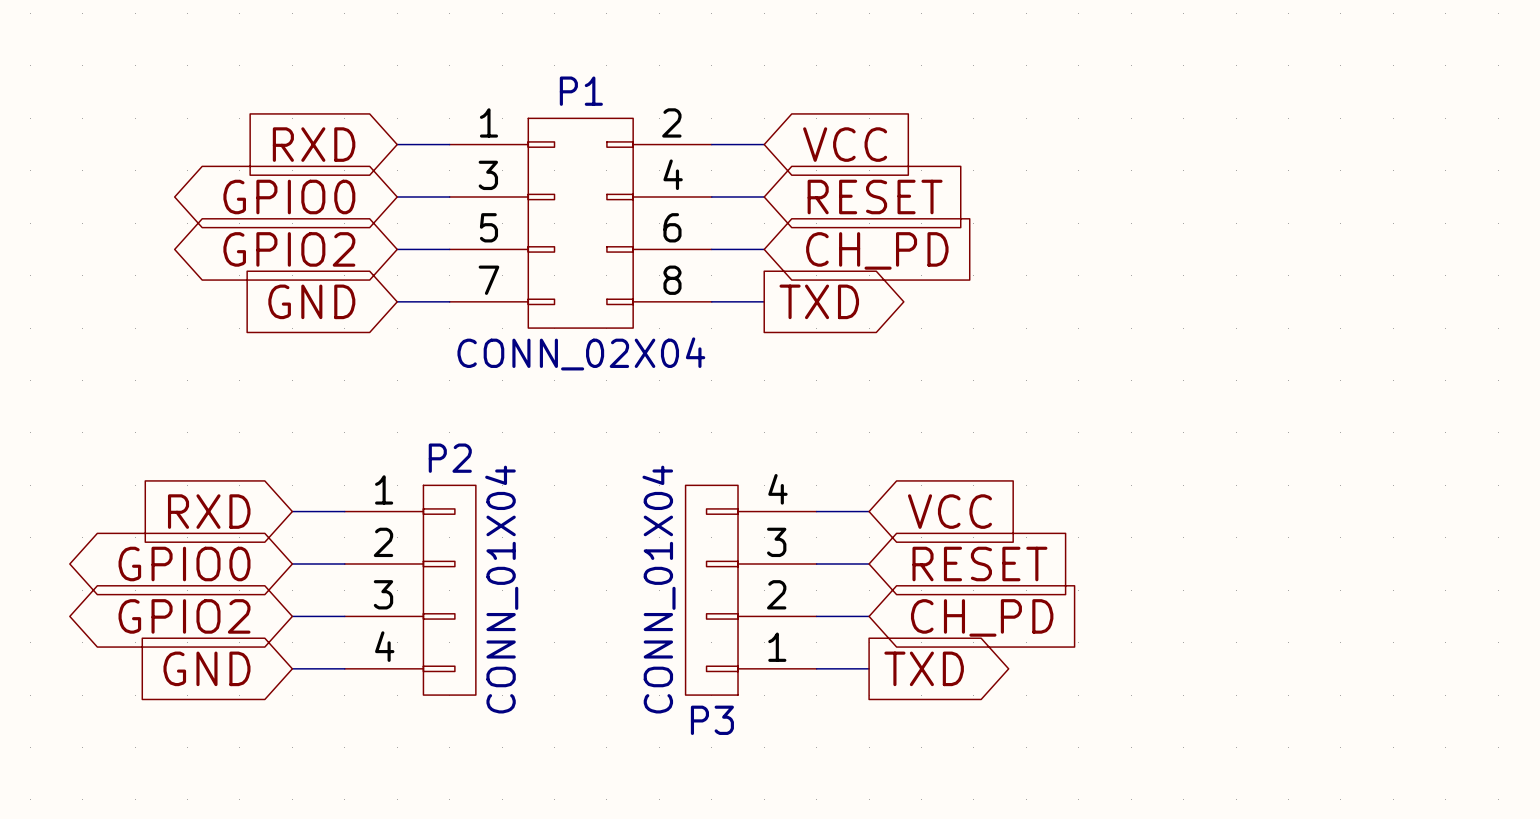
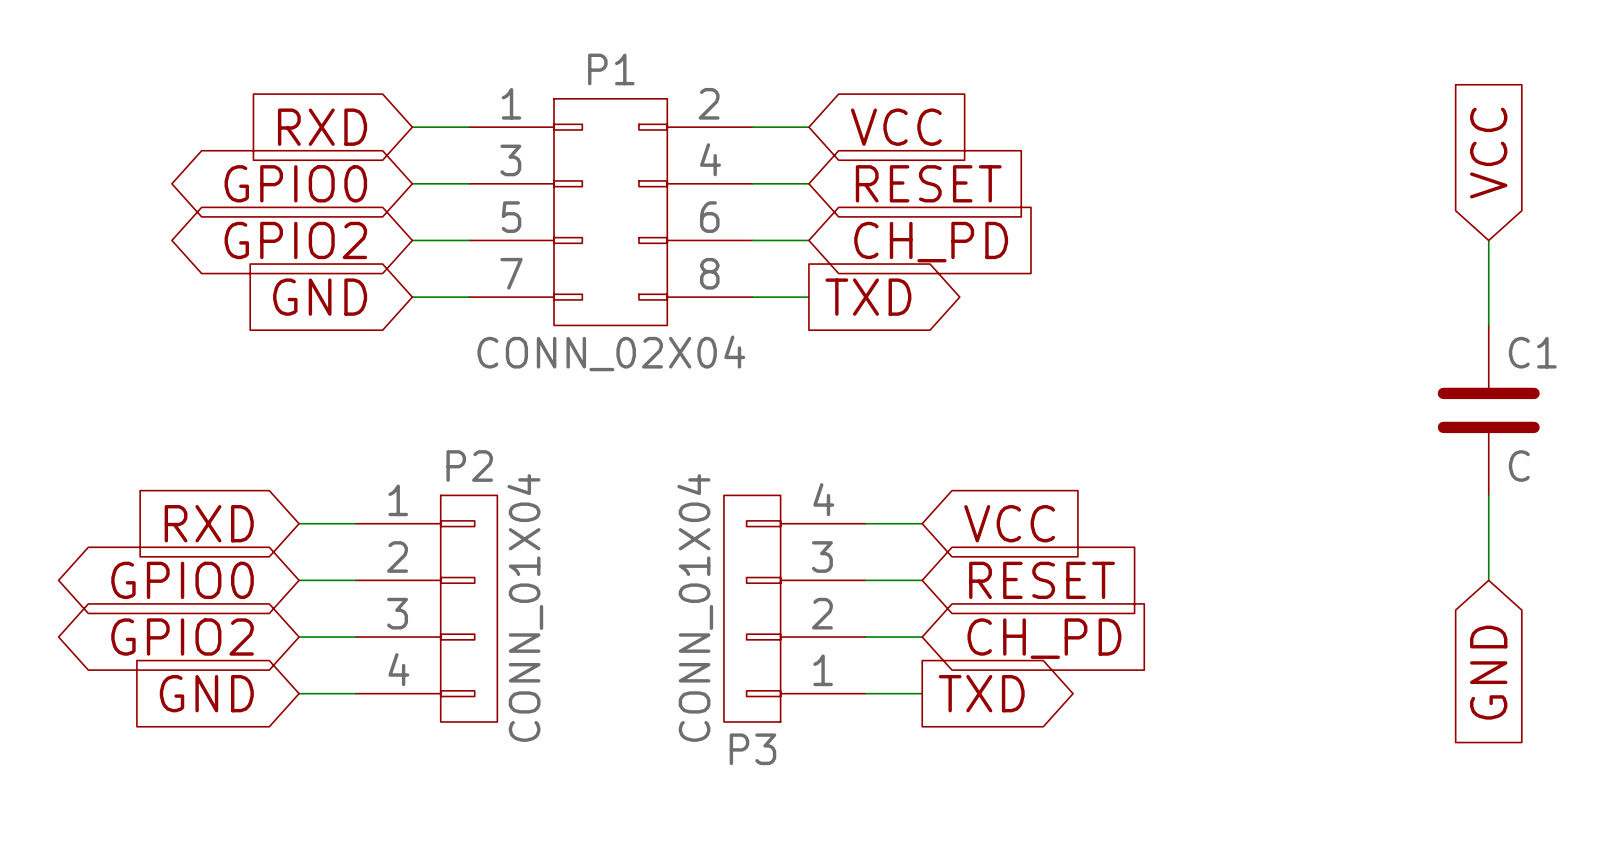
global label: none -> VCC (1488, 153)
wire: none -> (1488, 240) (1488, 325)
C1: none -> C (1488, 410)
wire: none -> (1488, 495) (1488, 580)
global label: none -> GND (1488, 672)

